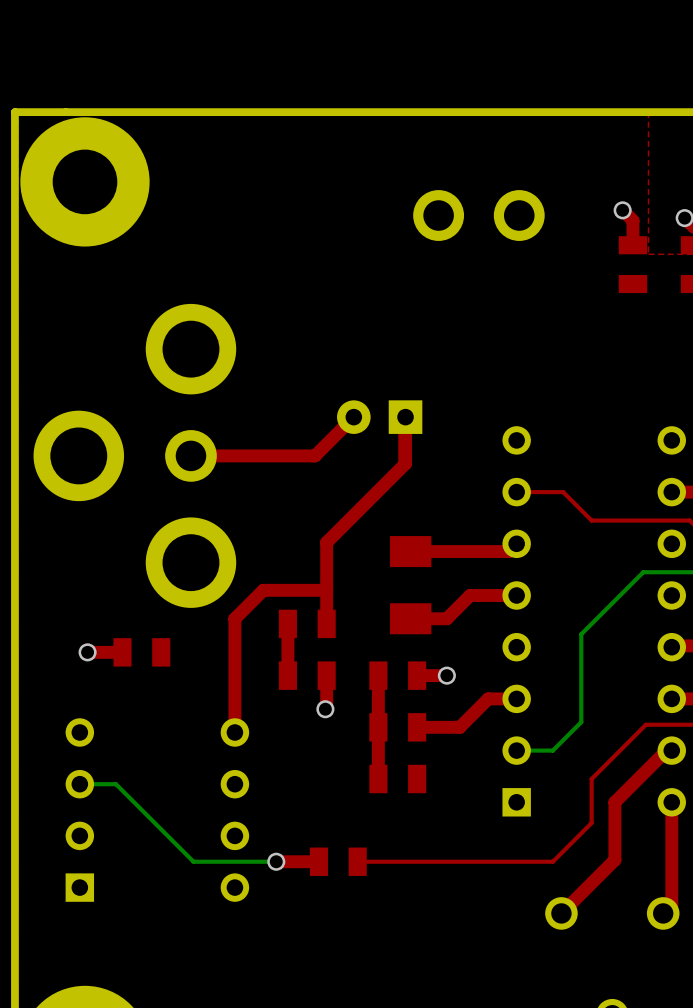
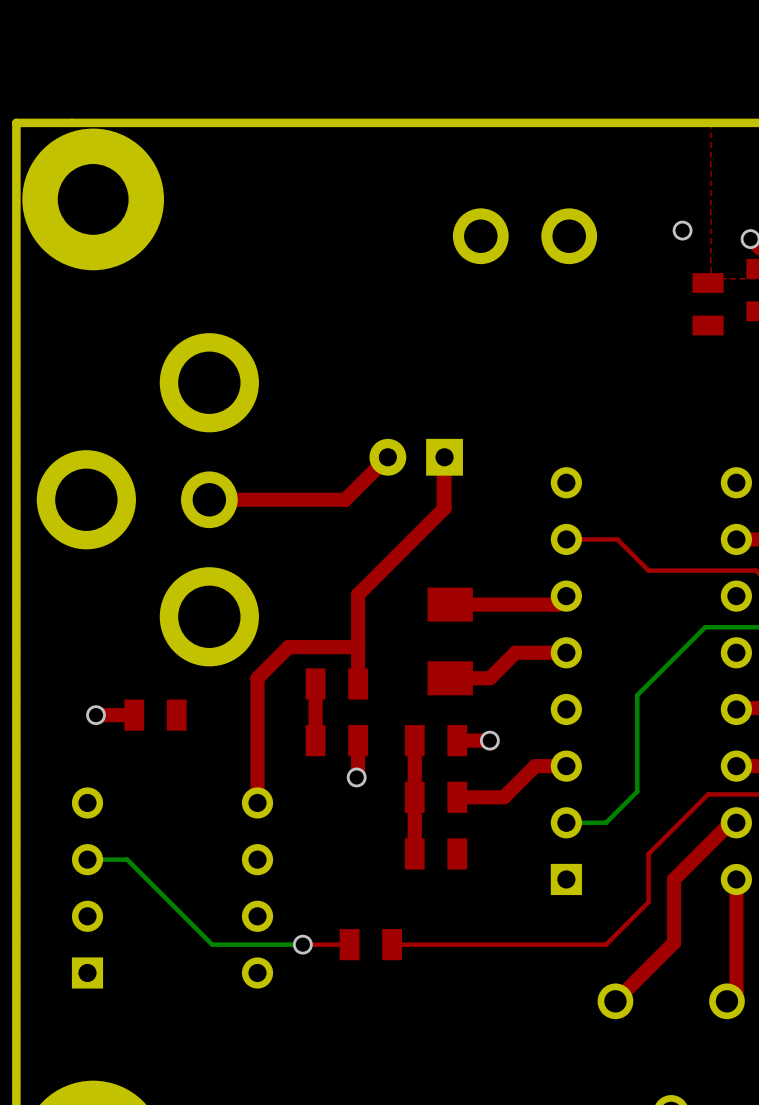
top track: (622, 210) (633, 220) (633, 245) -> none
part position: (633, 264) -> (708, 304)
top track width: thick (318, 861) (276, 861) -> thin (349, 944) (302, 944)

